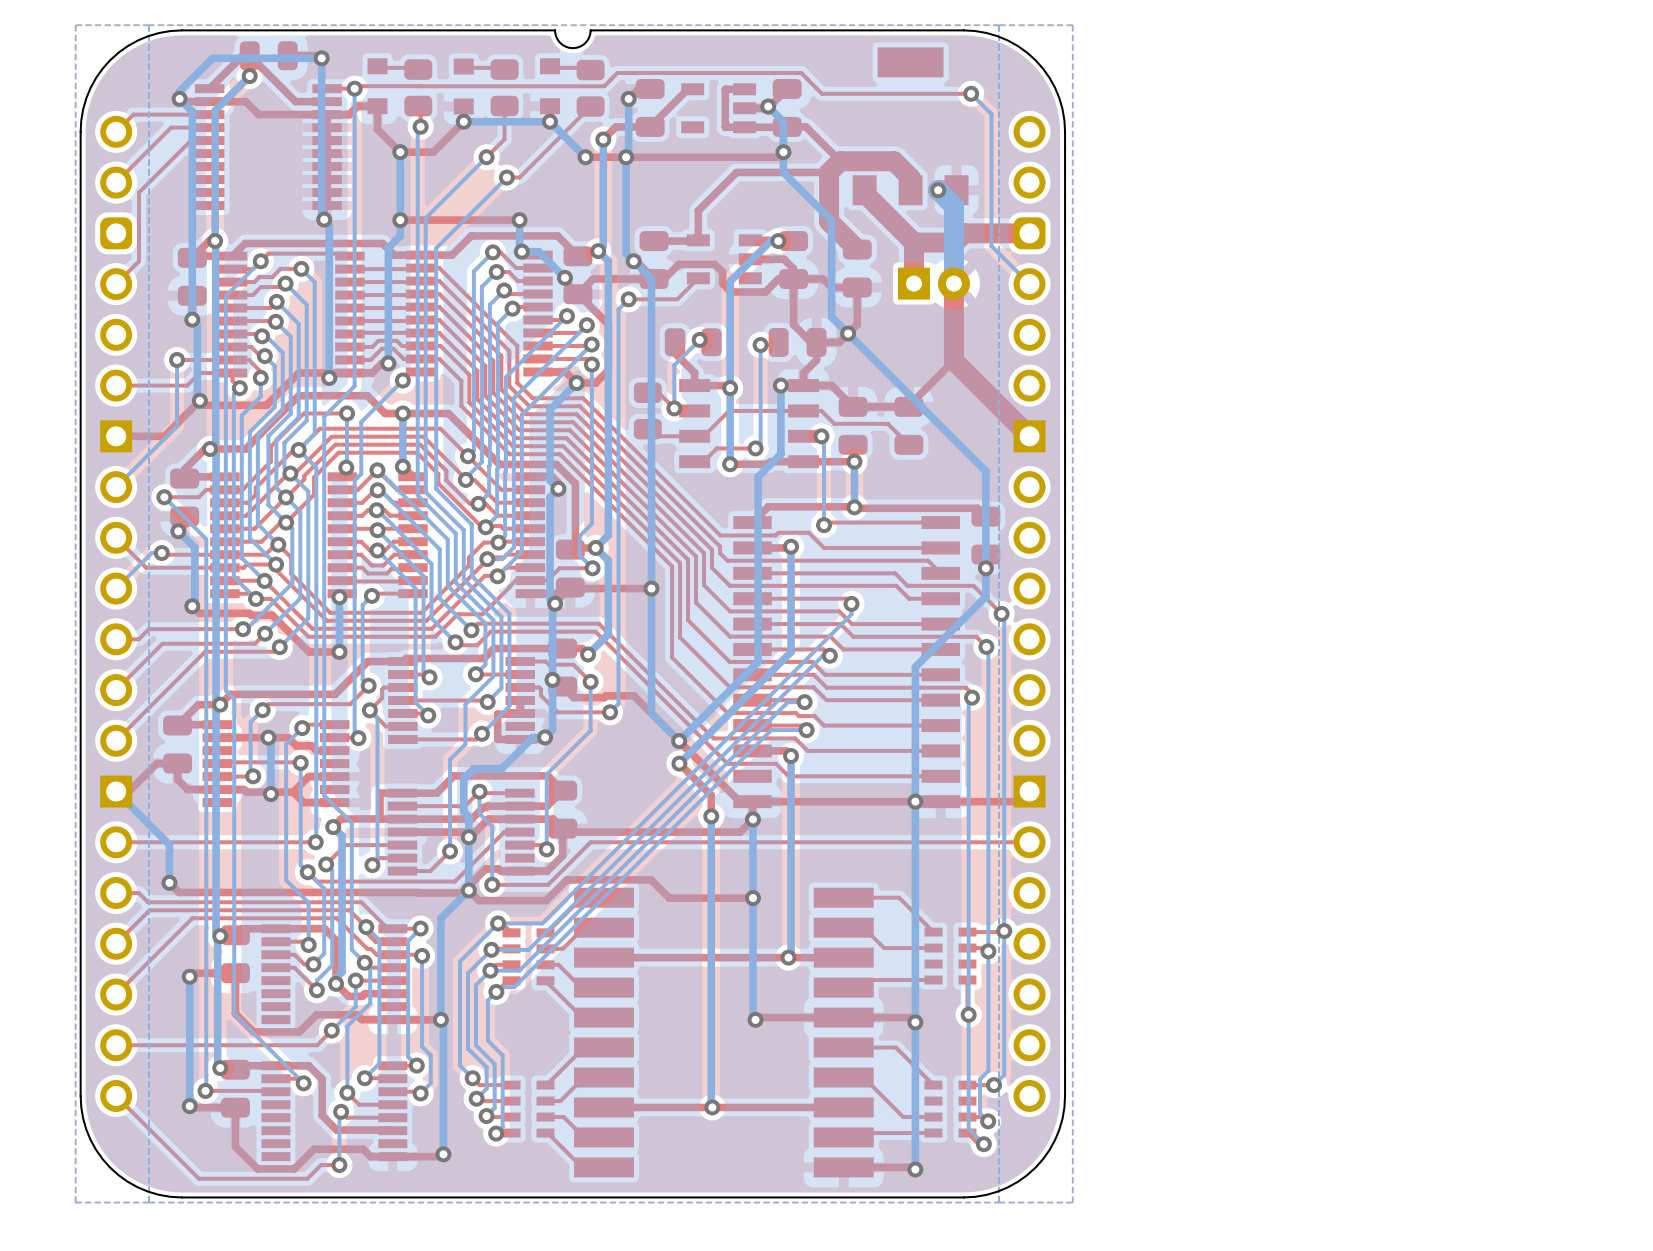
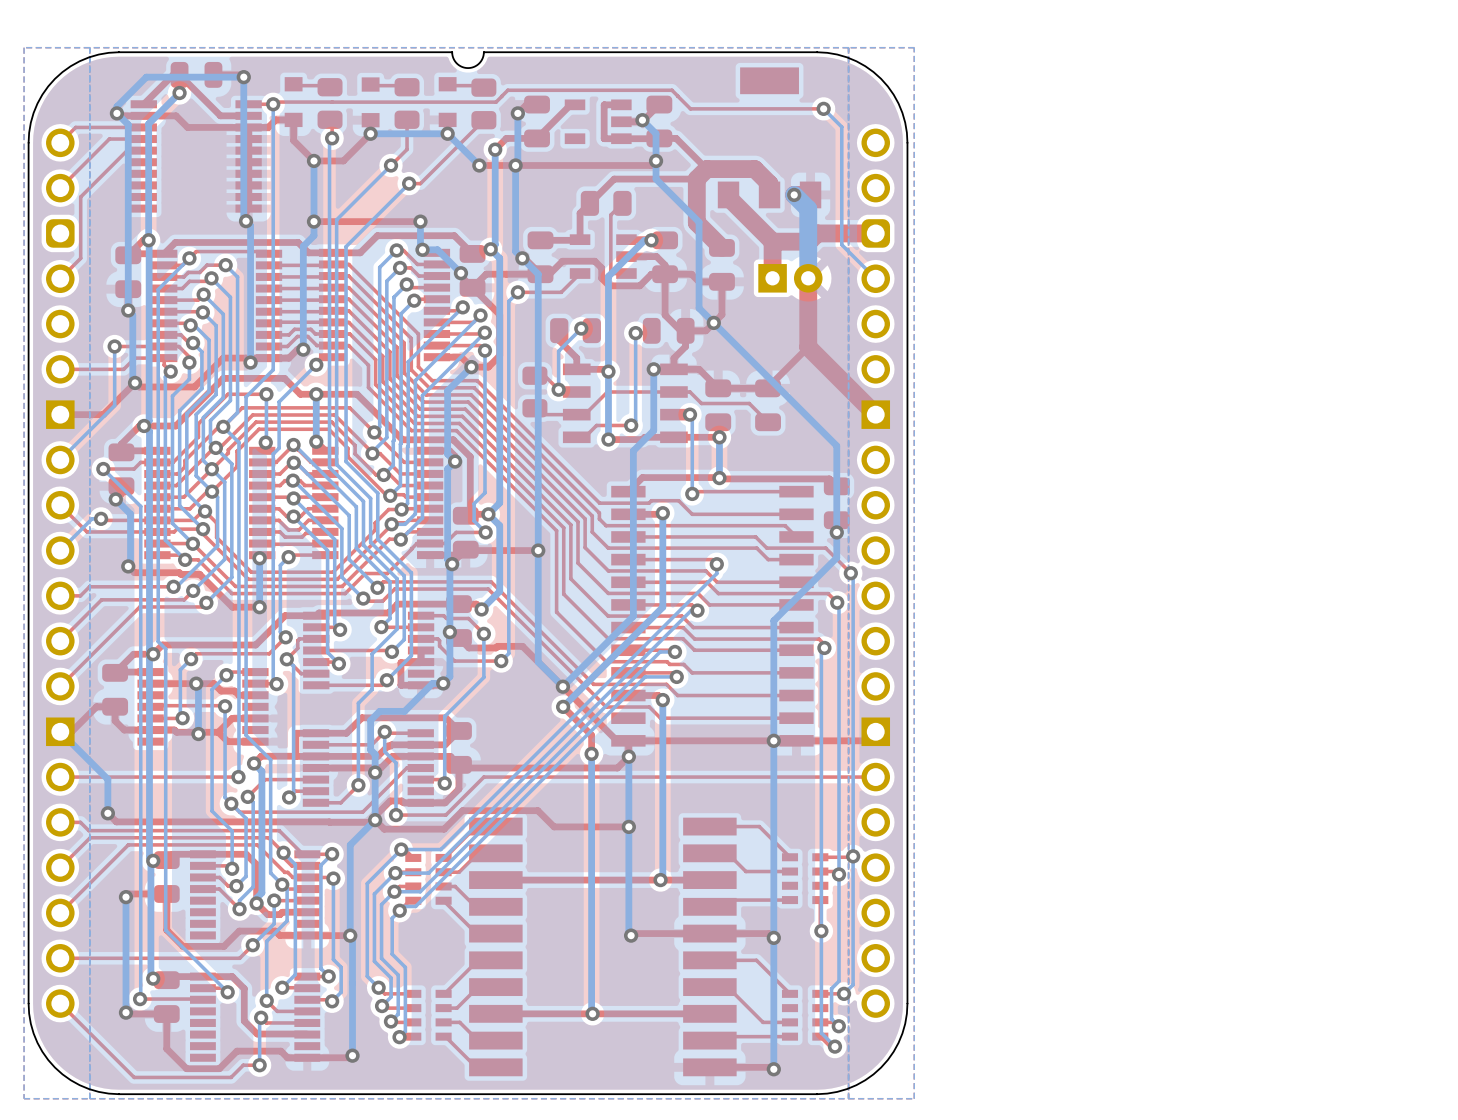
part: none -> (606, 203)
top track: none -> (622, 203) (610, 215) (610, 271) (612, 273) (626, 273)

